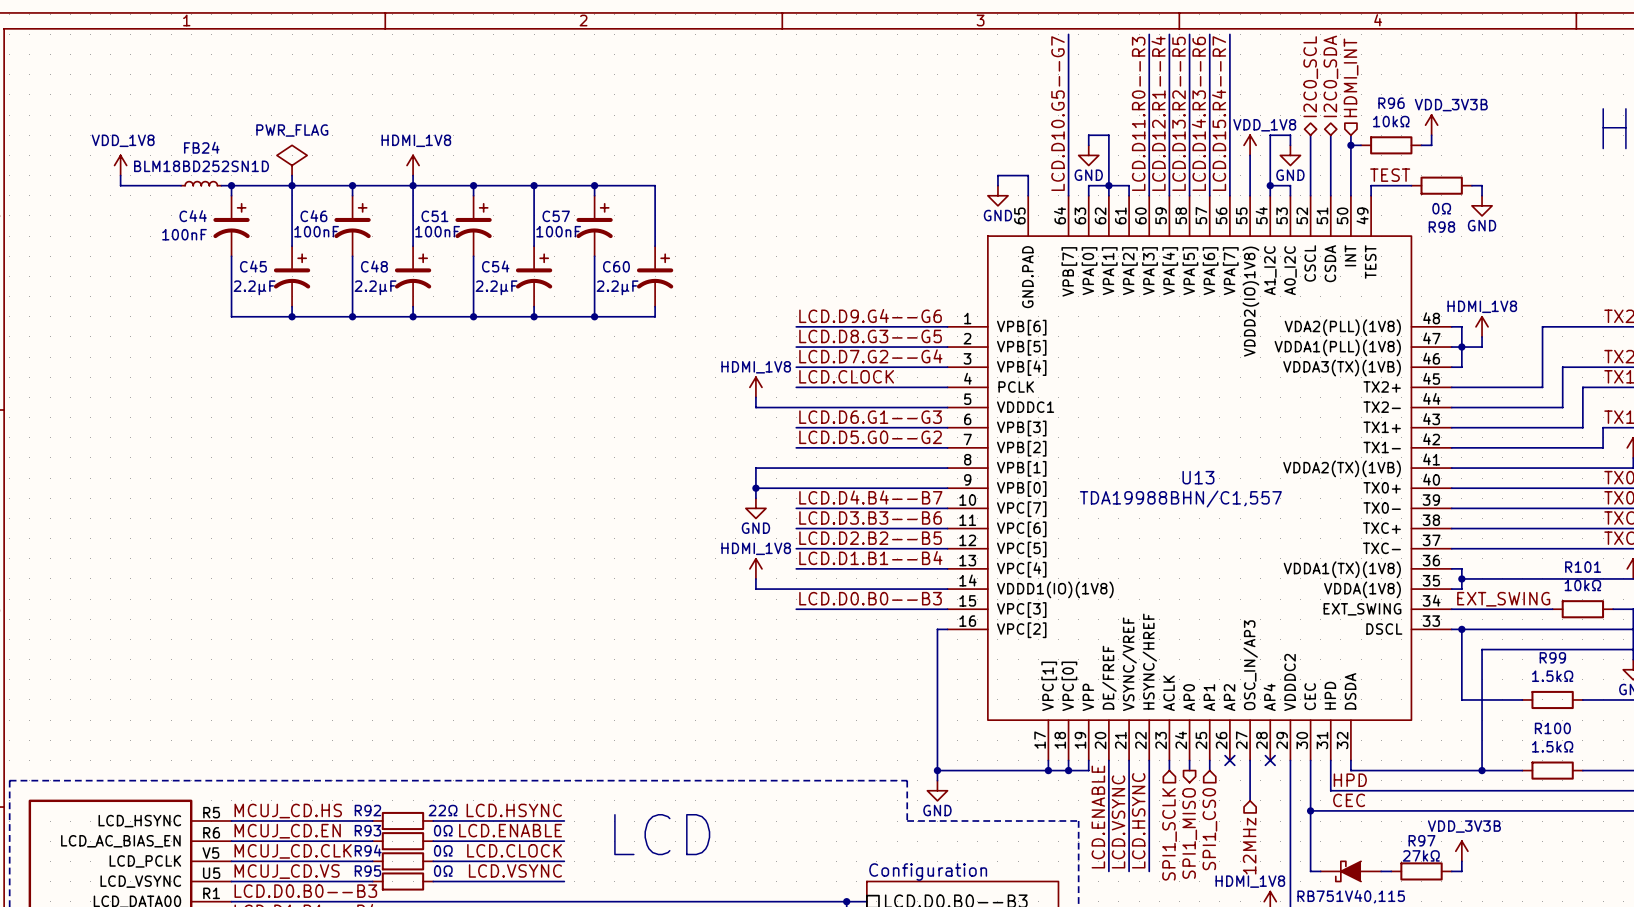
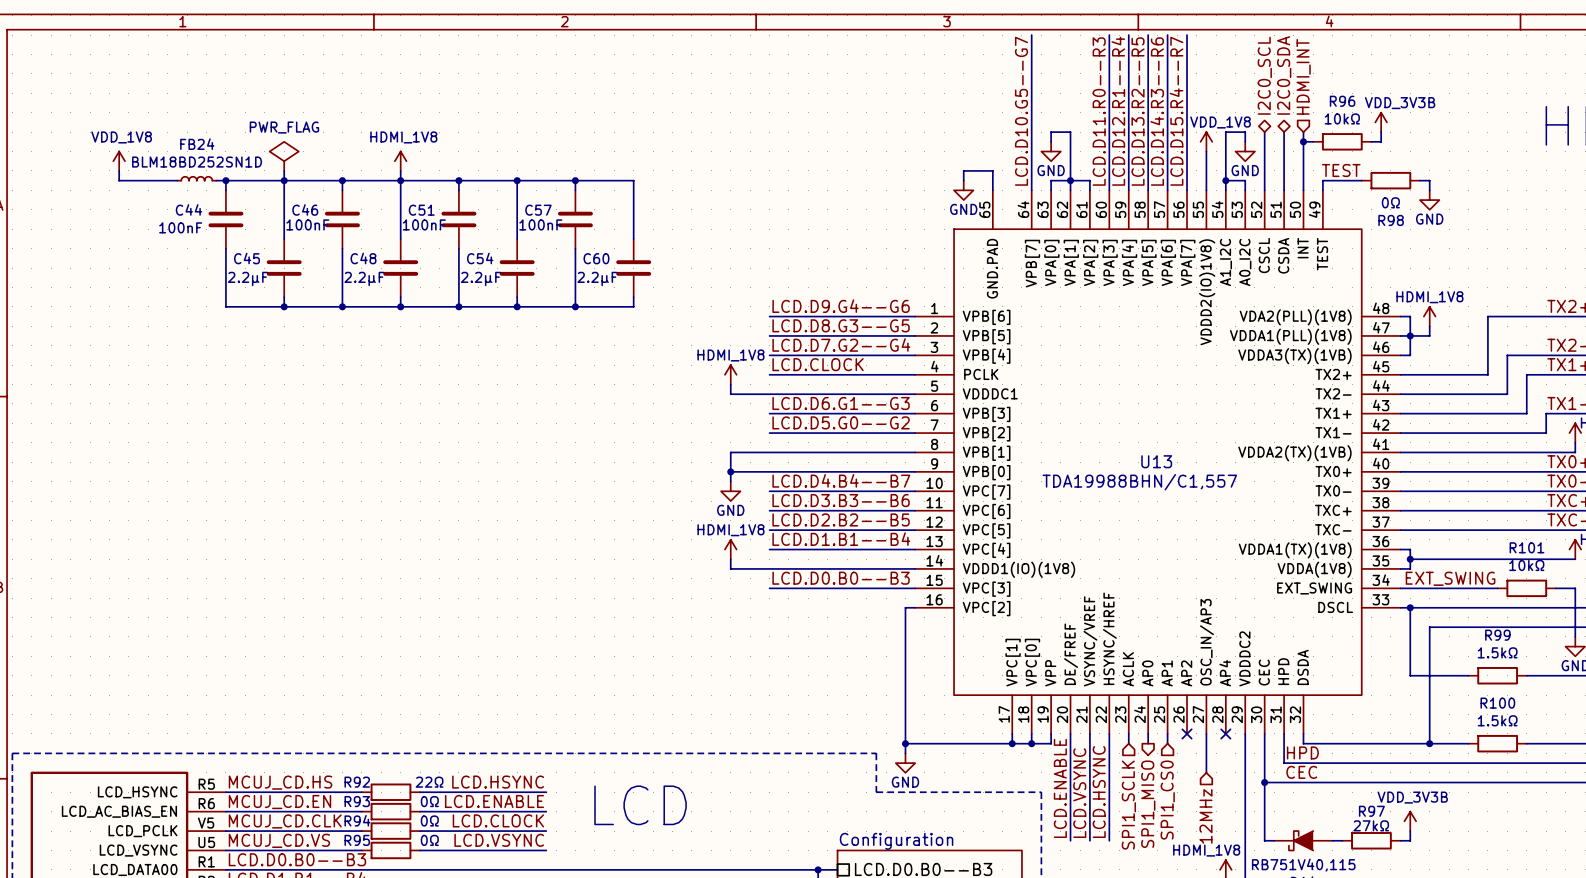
C44 symbol: [213, 195, 250, 257] -> [208, 190, 244, 249]
C46 symbol: [334, 195, 371, 257] -> [324, 190, 360, 249]
C51 symbol: [455, 195, 492, 257] -> [441, 190, 477, 249]
C57 symbol: [576, 195, 613, 257] -> [557, 190, 593, 249]
C45 symbol: [273, 246, 311, 307] -> [266, 238, 302, 298]
C48 symbol: [394, 246, 432, 307] -> [383, 238, 419, 298]
C54 symbol: [515, 246, 553, 307] -> [499, 238, 535, 298]
C60 symbol: [636, 246, 674, 307] -> [616, 238, 652, 298]

